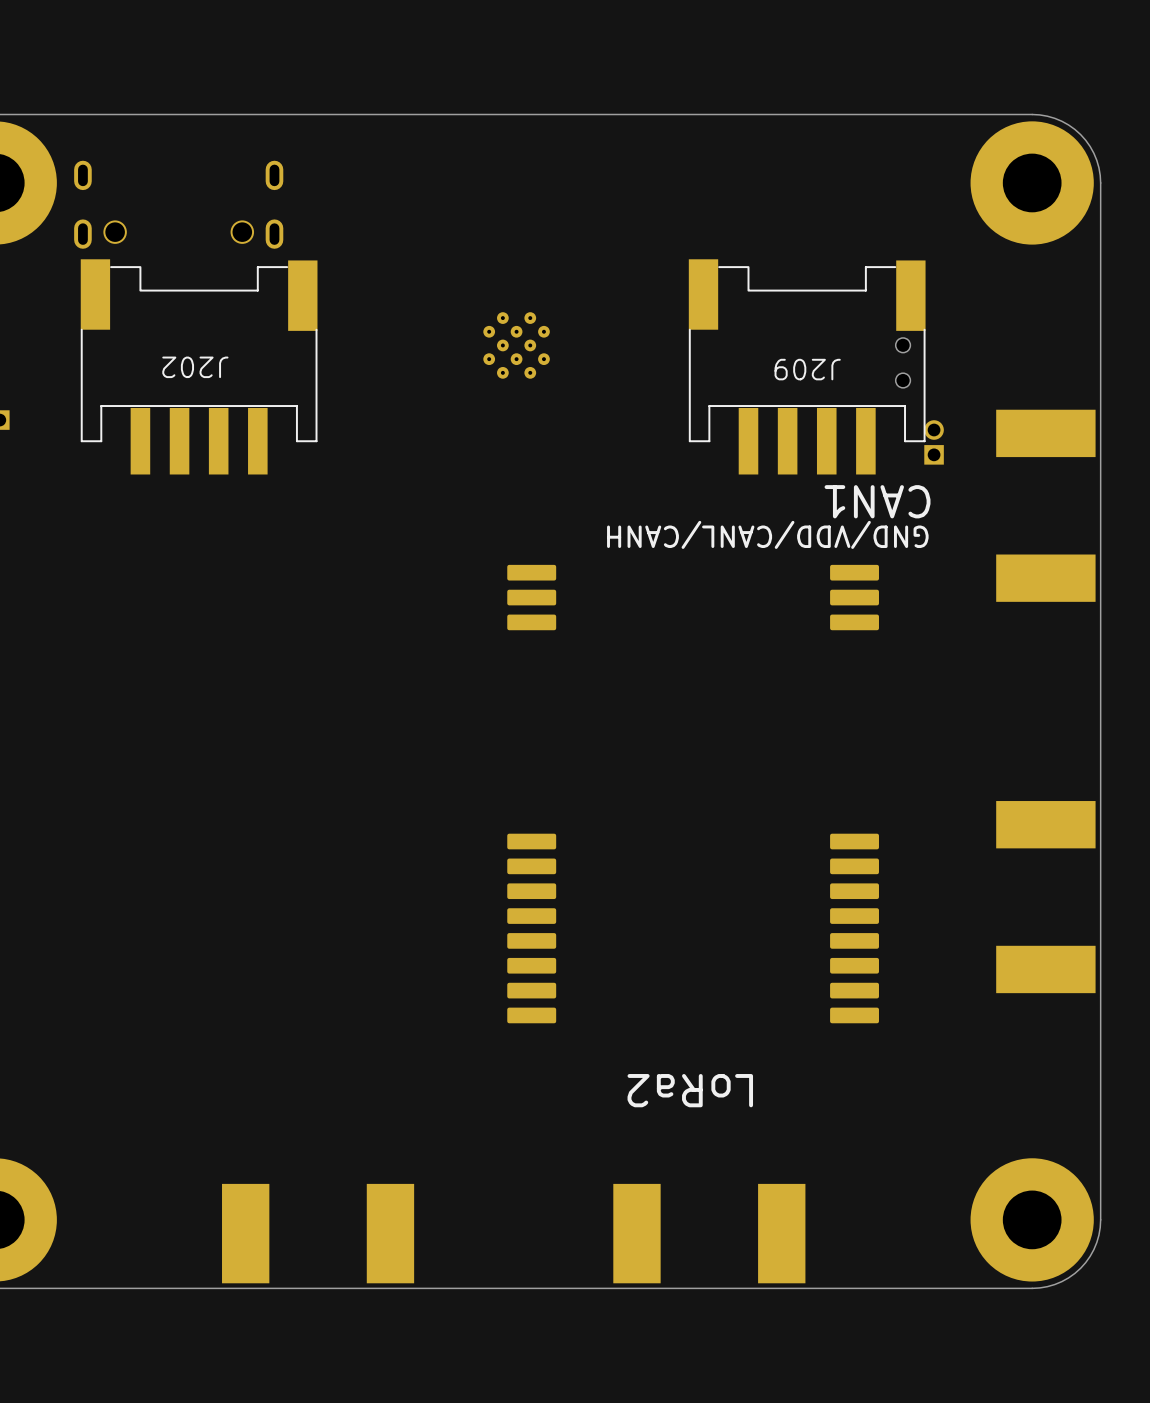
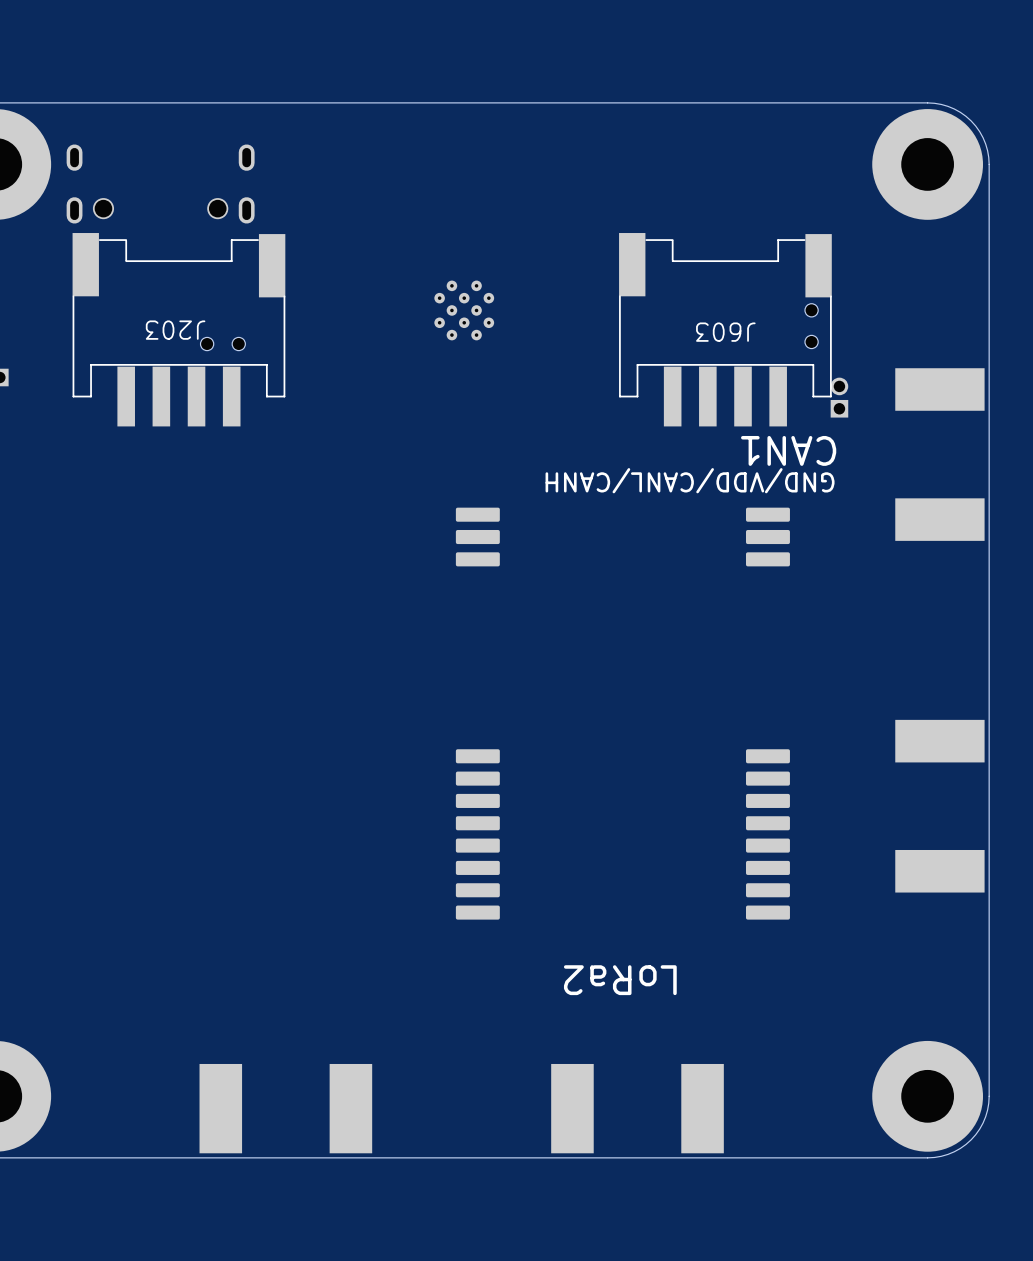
J202 name: J202 (195, 367) -> J203 (175, 330)
J209 name: J209 (807, 369) -> J603 (725, 332)
part: none -> (222, 344)

